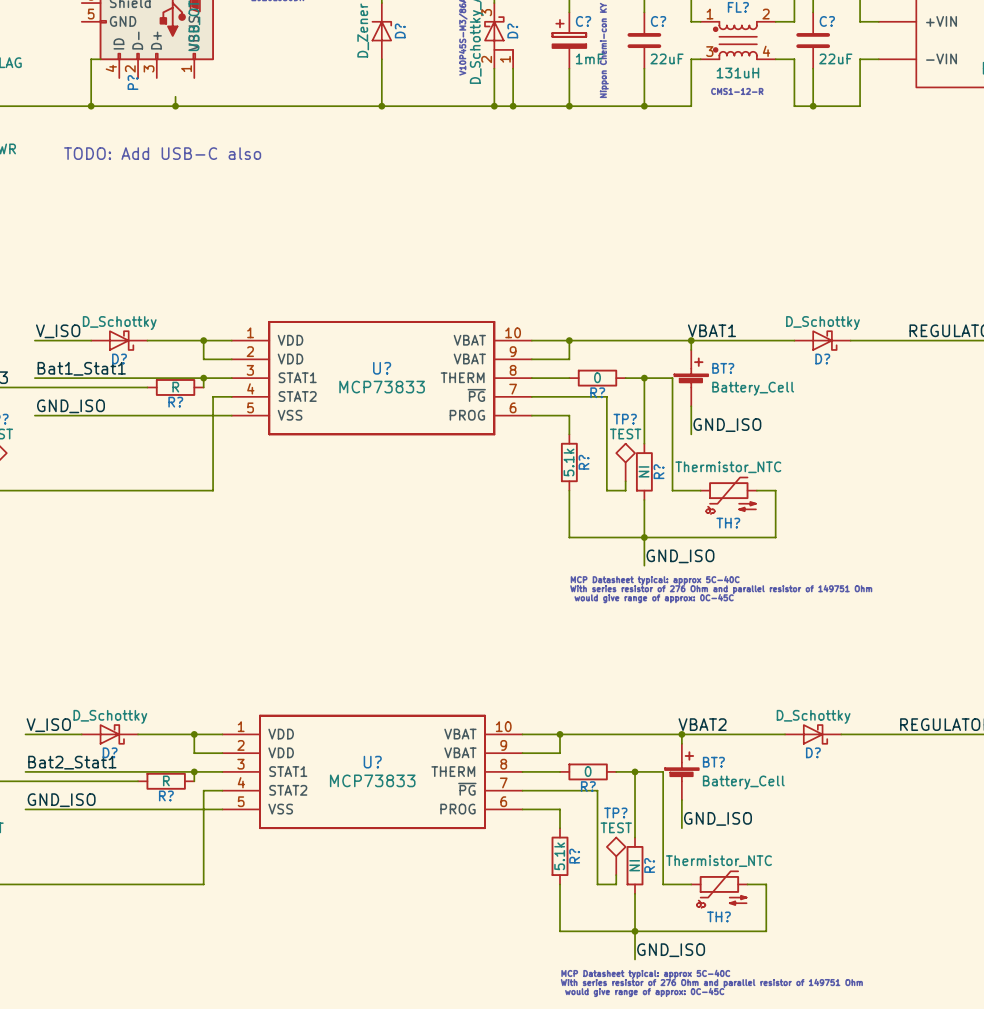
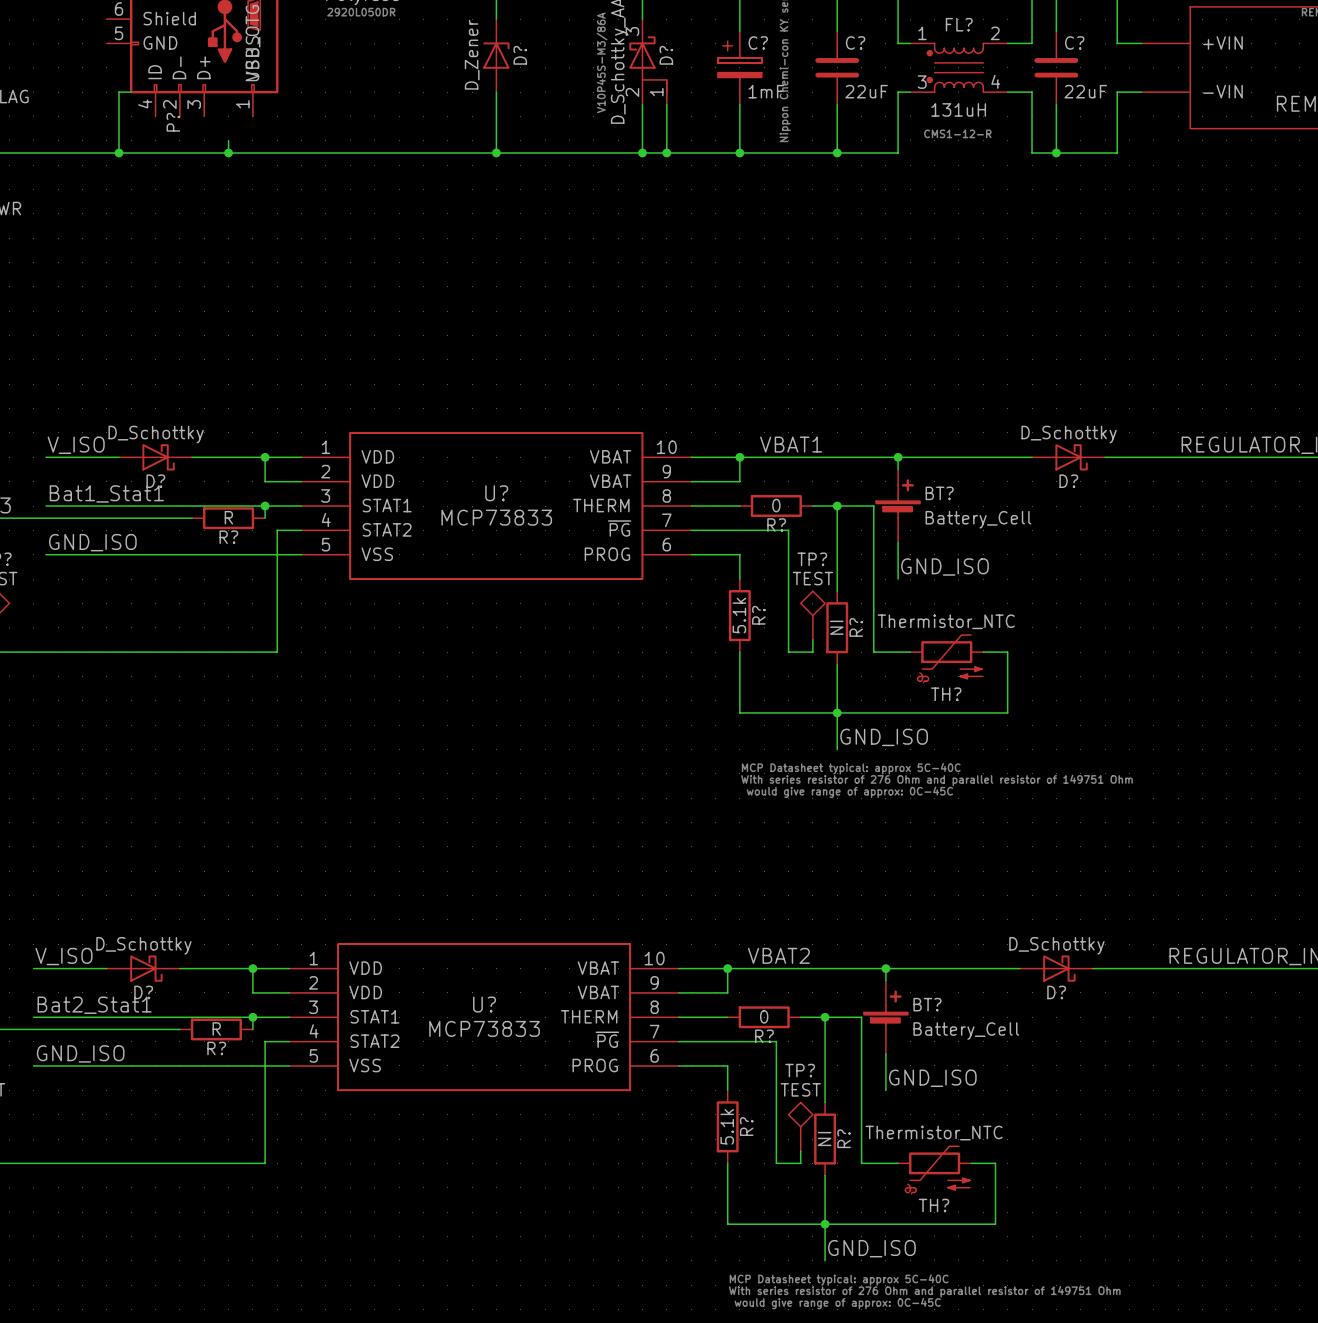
text: TODO: Add USB-C also (162, 153) -> none
label position: VBAT1 (711, 330) -> VBAT1 (791, 444)
label position: VBAT2 (702, 724) -> VBAT2 (778, 955)

